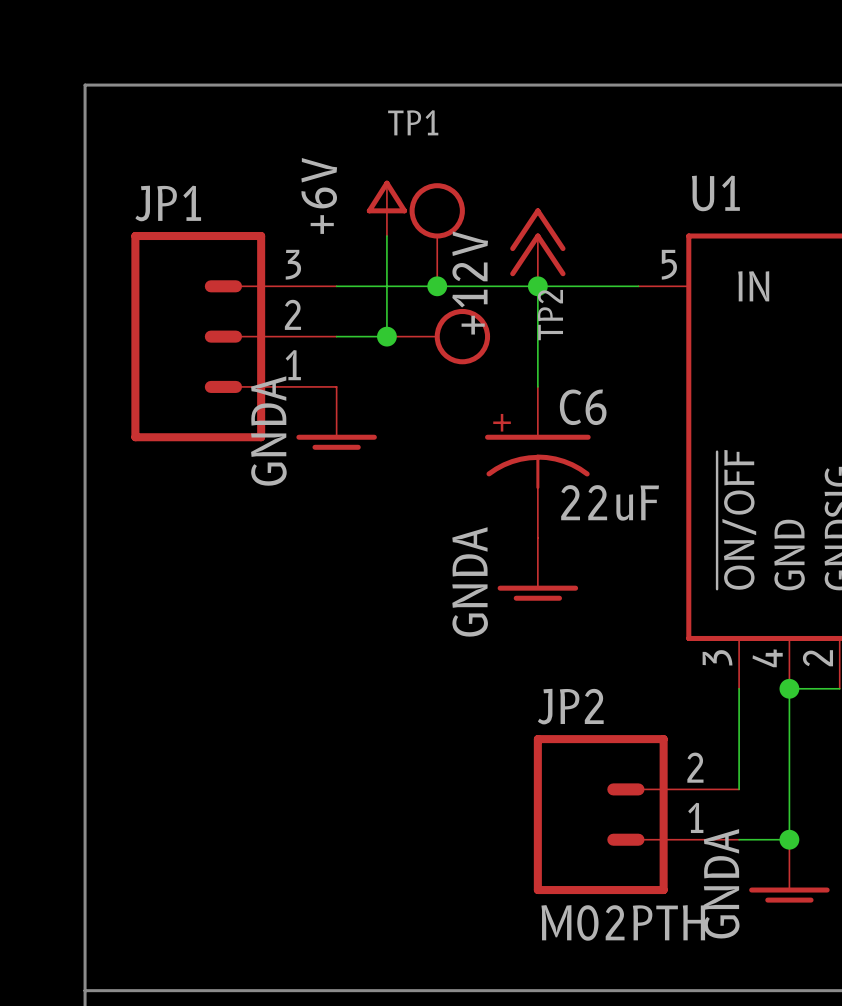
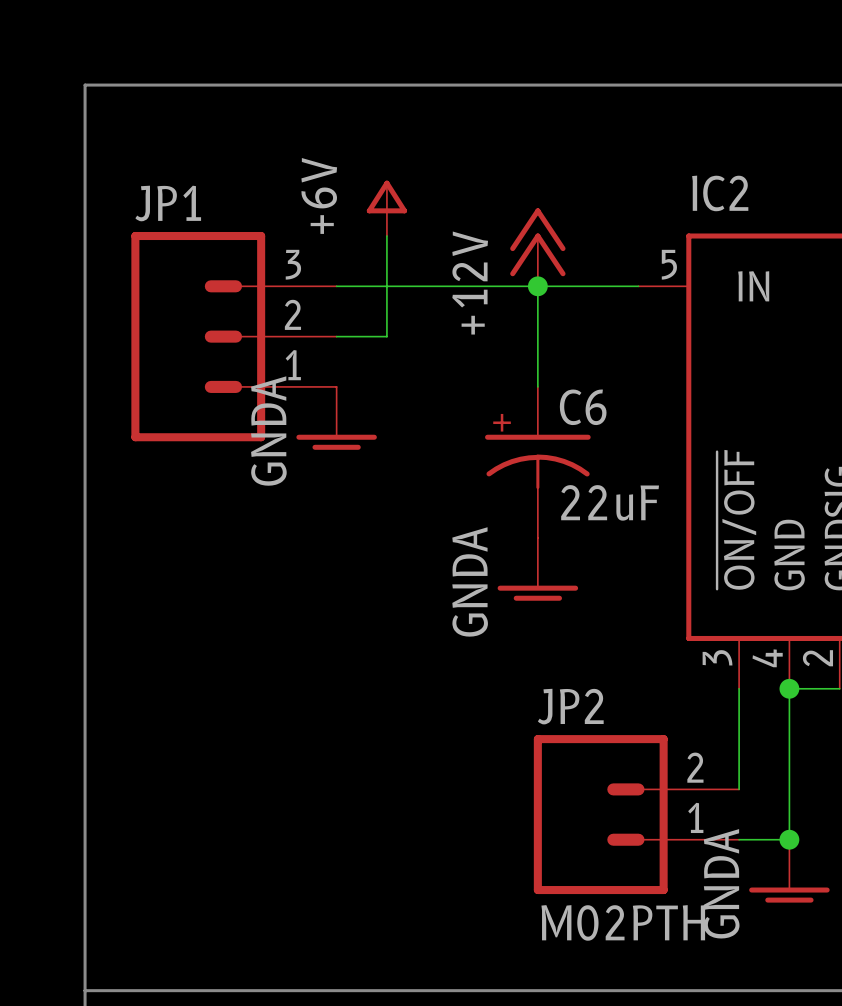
U1 name: U1 (715, 193) -> IC2 (720, 193)
TP1: (437, 234) -> none
junction: (437, 286) -> none
junction: (386, 336) -> none
TP2: (438, 336) -> none

